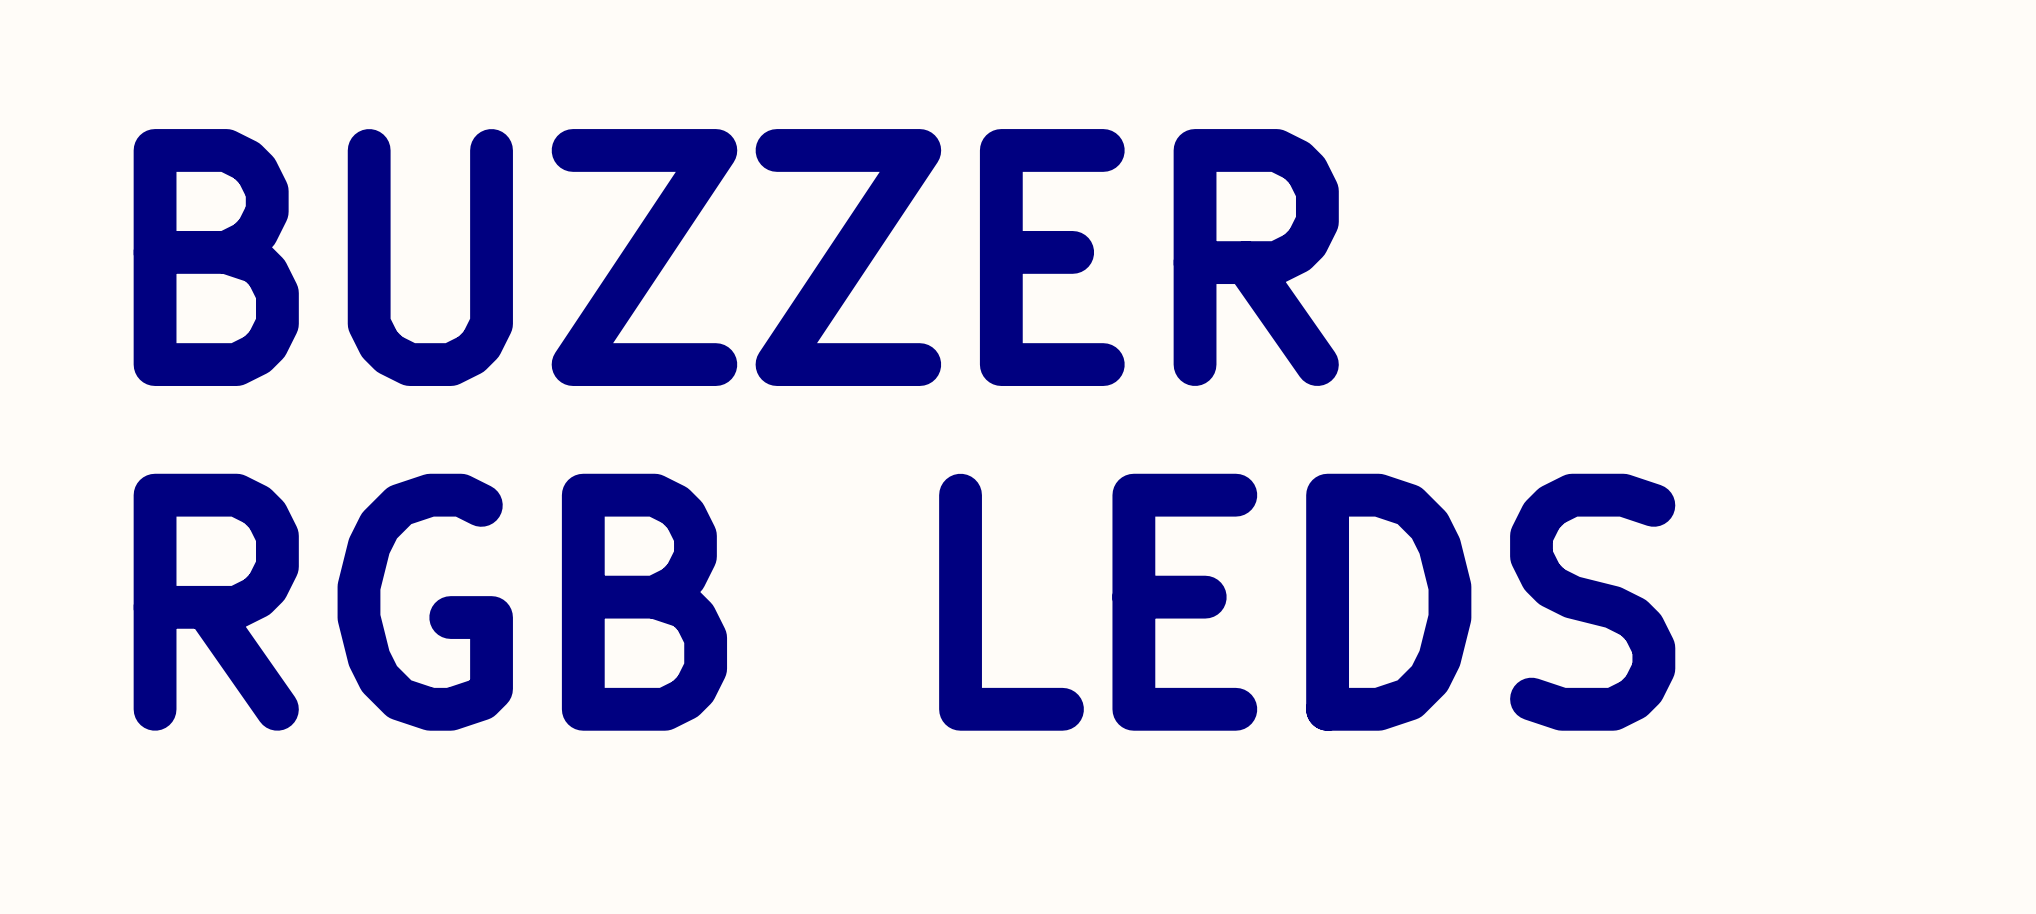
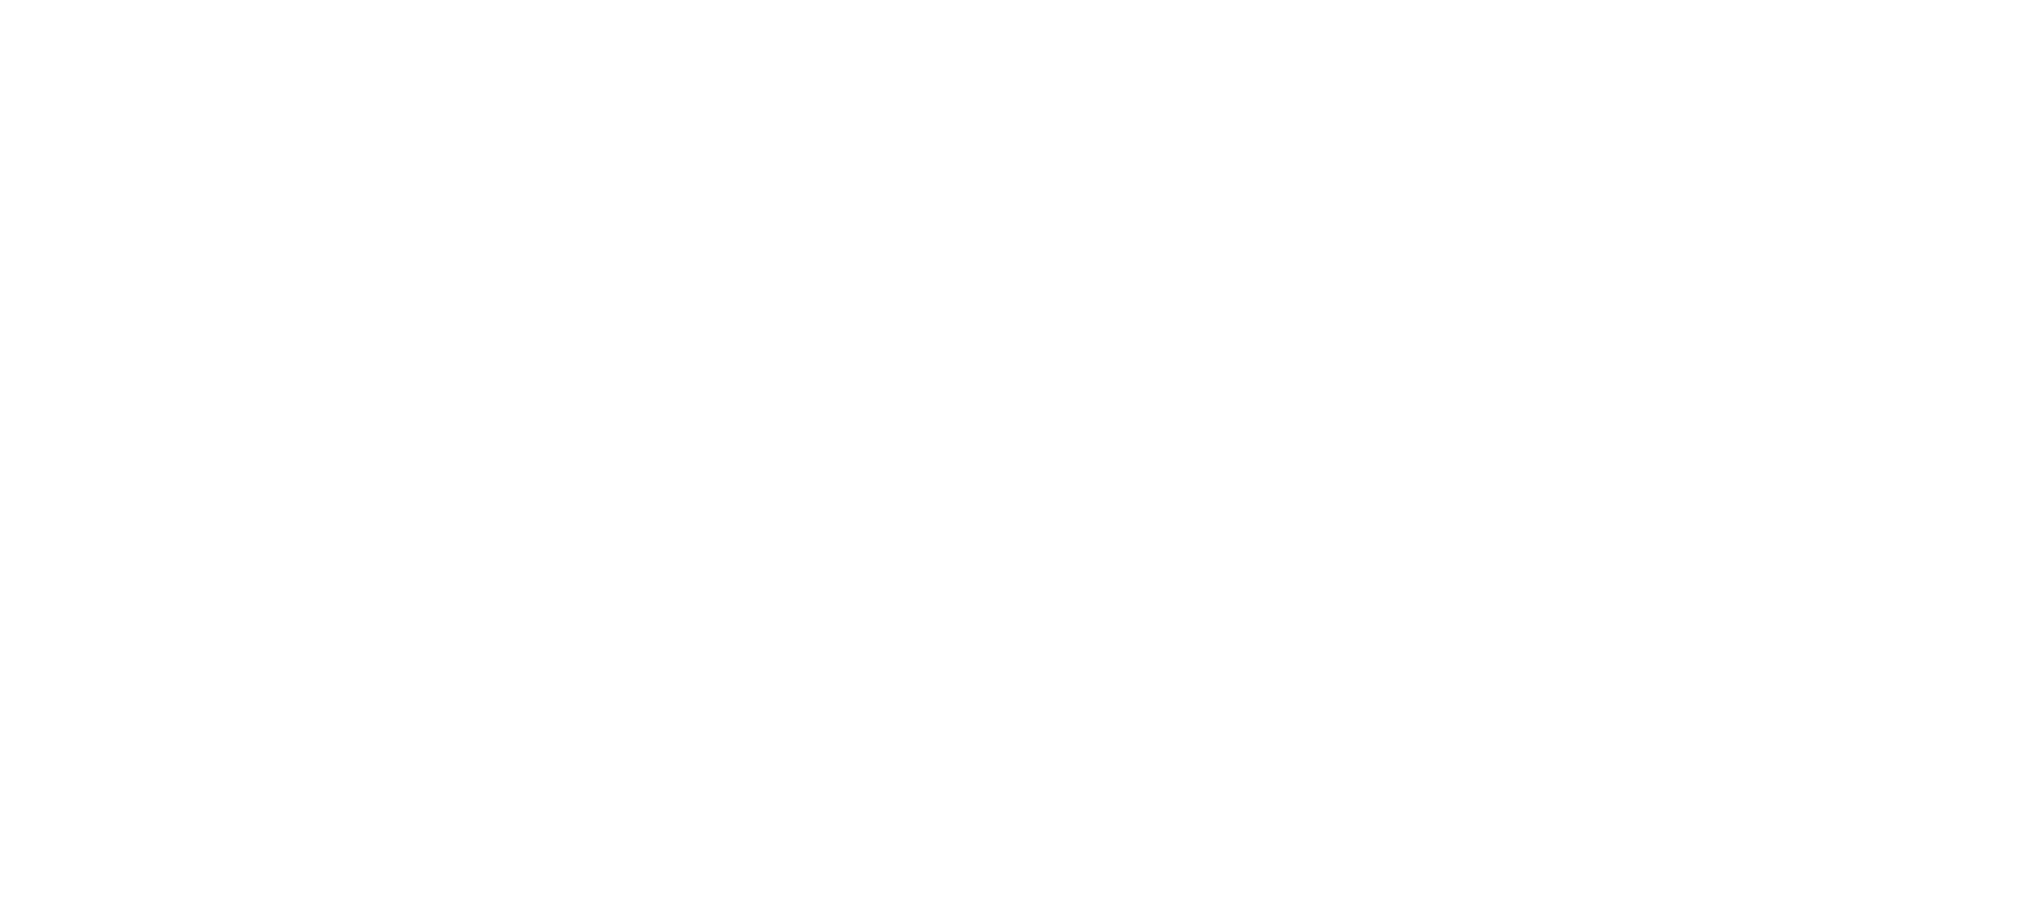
text: BUZZER (736, 257) -> none
text: RGB LEDS (904, 602) -> none

